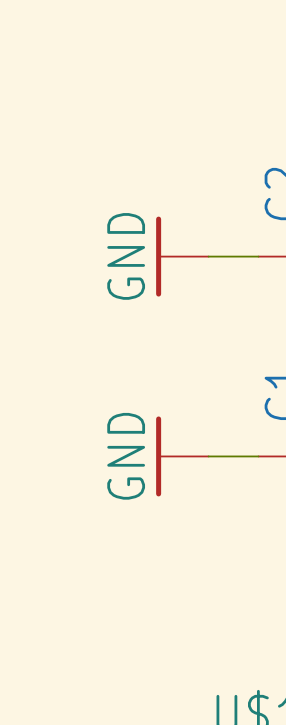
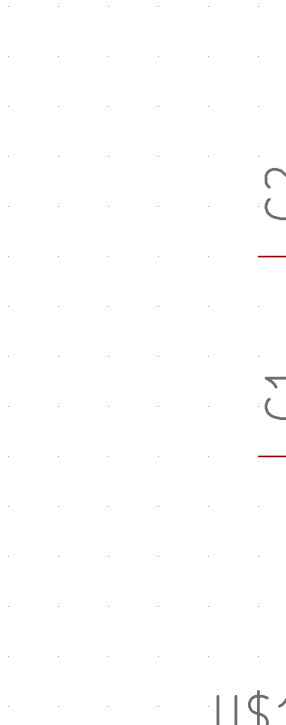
power symbol: GND (182, 256) -> none
wire: (208, 256) (258, 256) -> none
power symbol: GND (182, 456) -> none
wire: (208, 456) (258, 456) -> none

